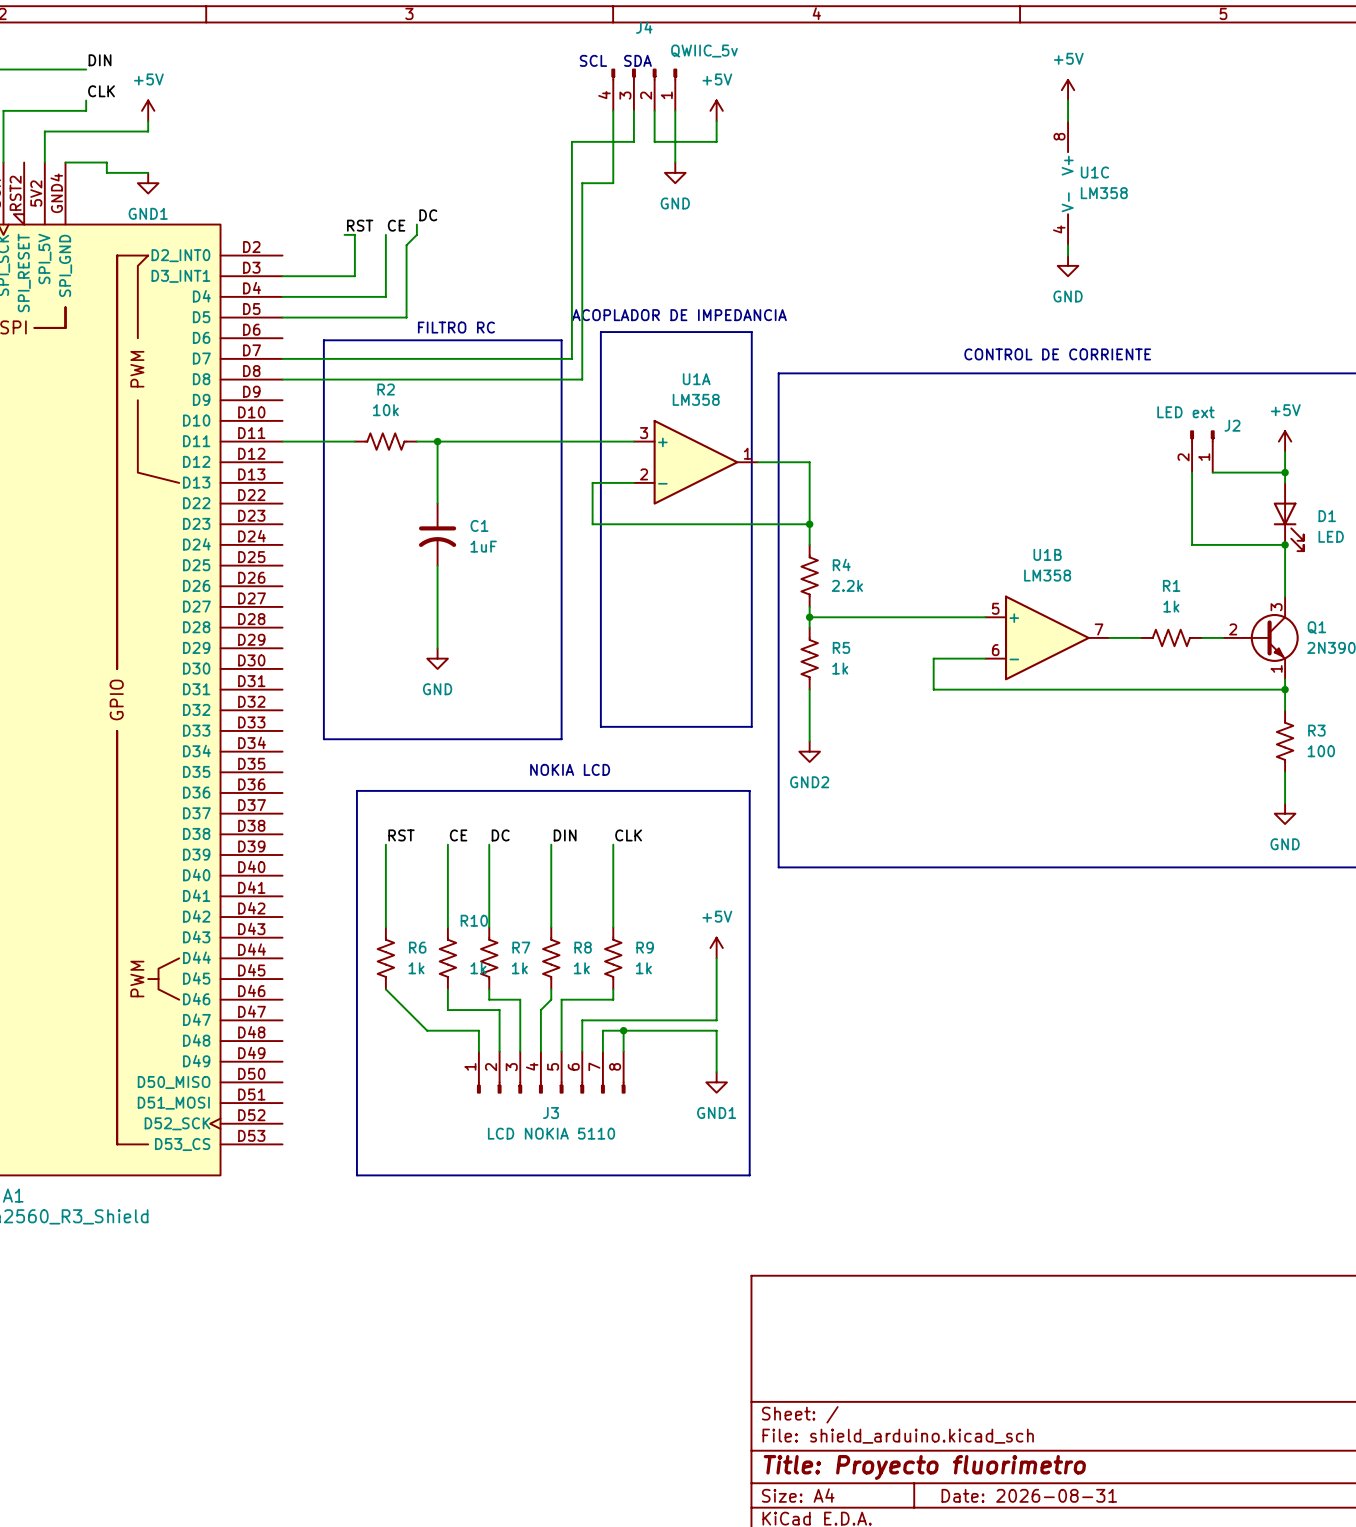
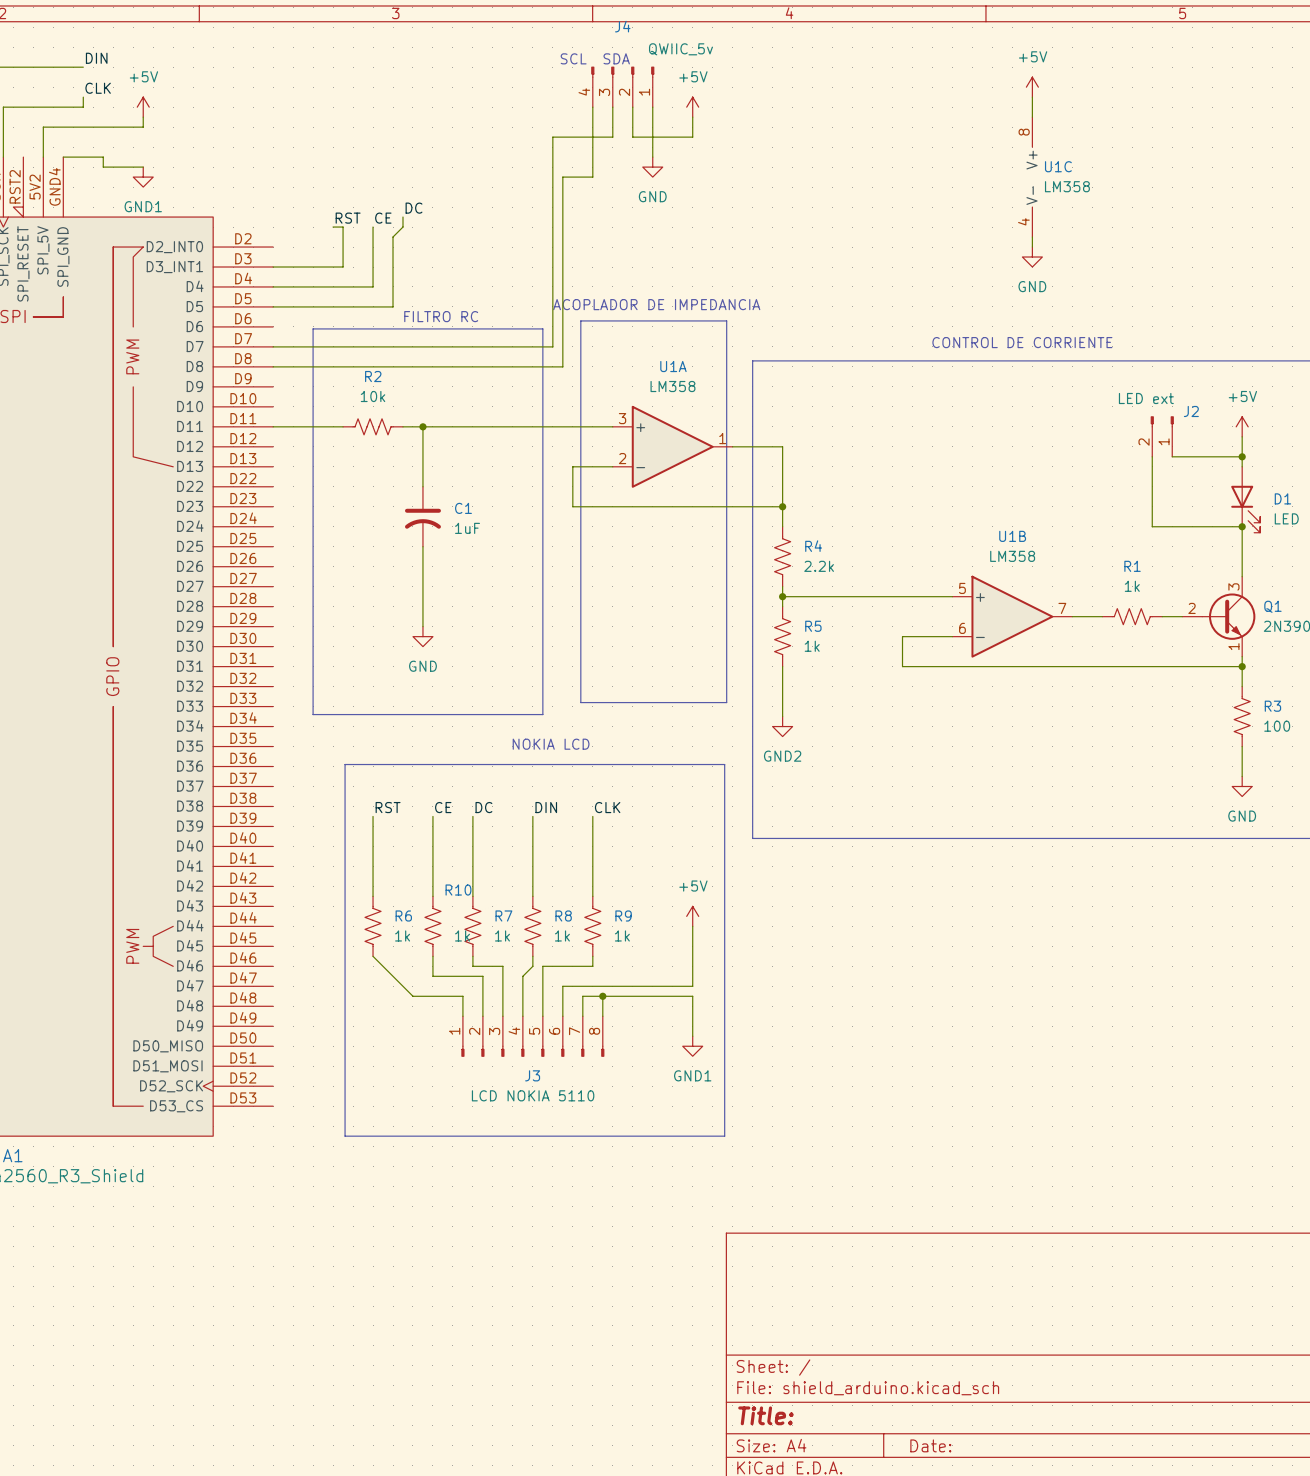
title block: Title: Proyecto fluorimetro (924, 1467) -> Title: (765, 1415)
title block: Date: 2026-08-31 (1029, 1495) -> Date: (930, 1445)

